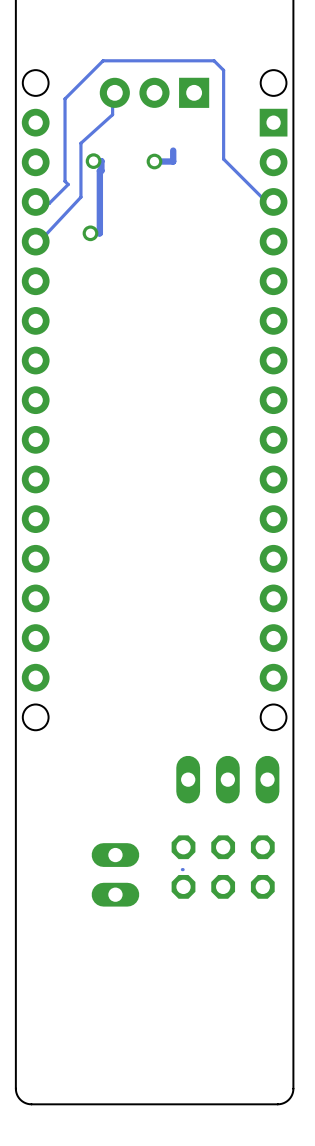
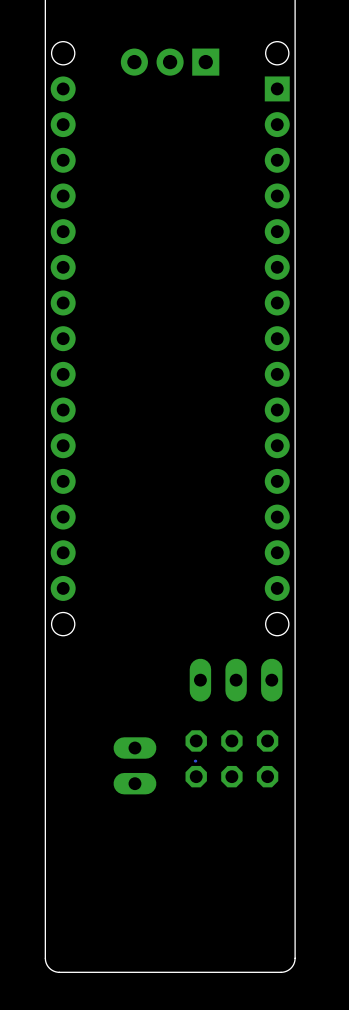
track: (114, 92) (112, 95) (112, 114) (80, 143) (80, 197) (36, 244) (35, 241) -> none
track: (173, 150) (173, 161) (154, 161) -> none
track: (93, 161) (101, 161) (99, 233) (90, 233) -> none
via: (93, 161) -> none
via: (154, 161) -> none
track: (36, 200) (36, 203) (49, 203) (68, 184) (65, 181) (65, 98) (103, 60) (214, 60) (223, 70) (223, 159) (264, 200) (273, 201) -> none
via: (90, 233) -> none

